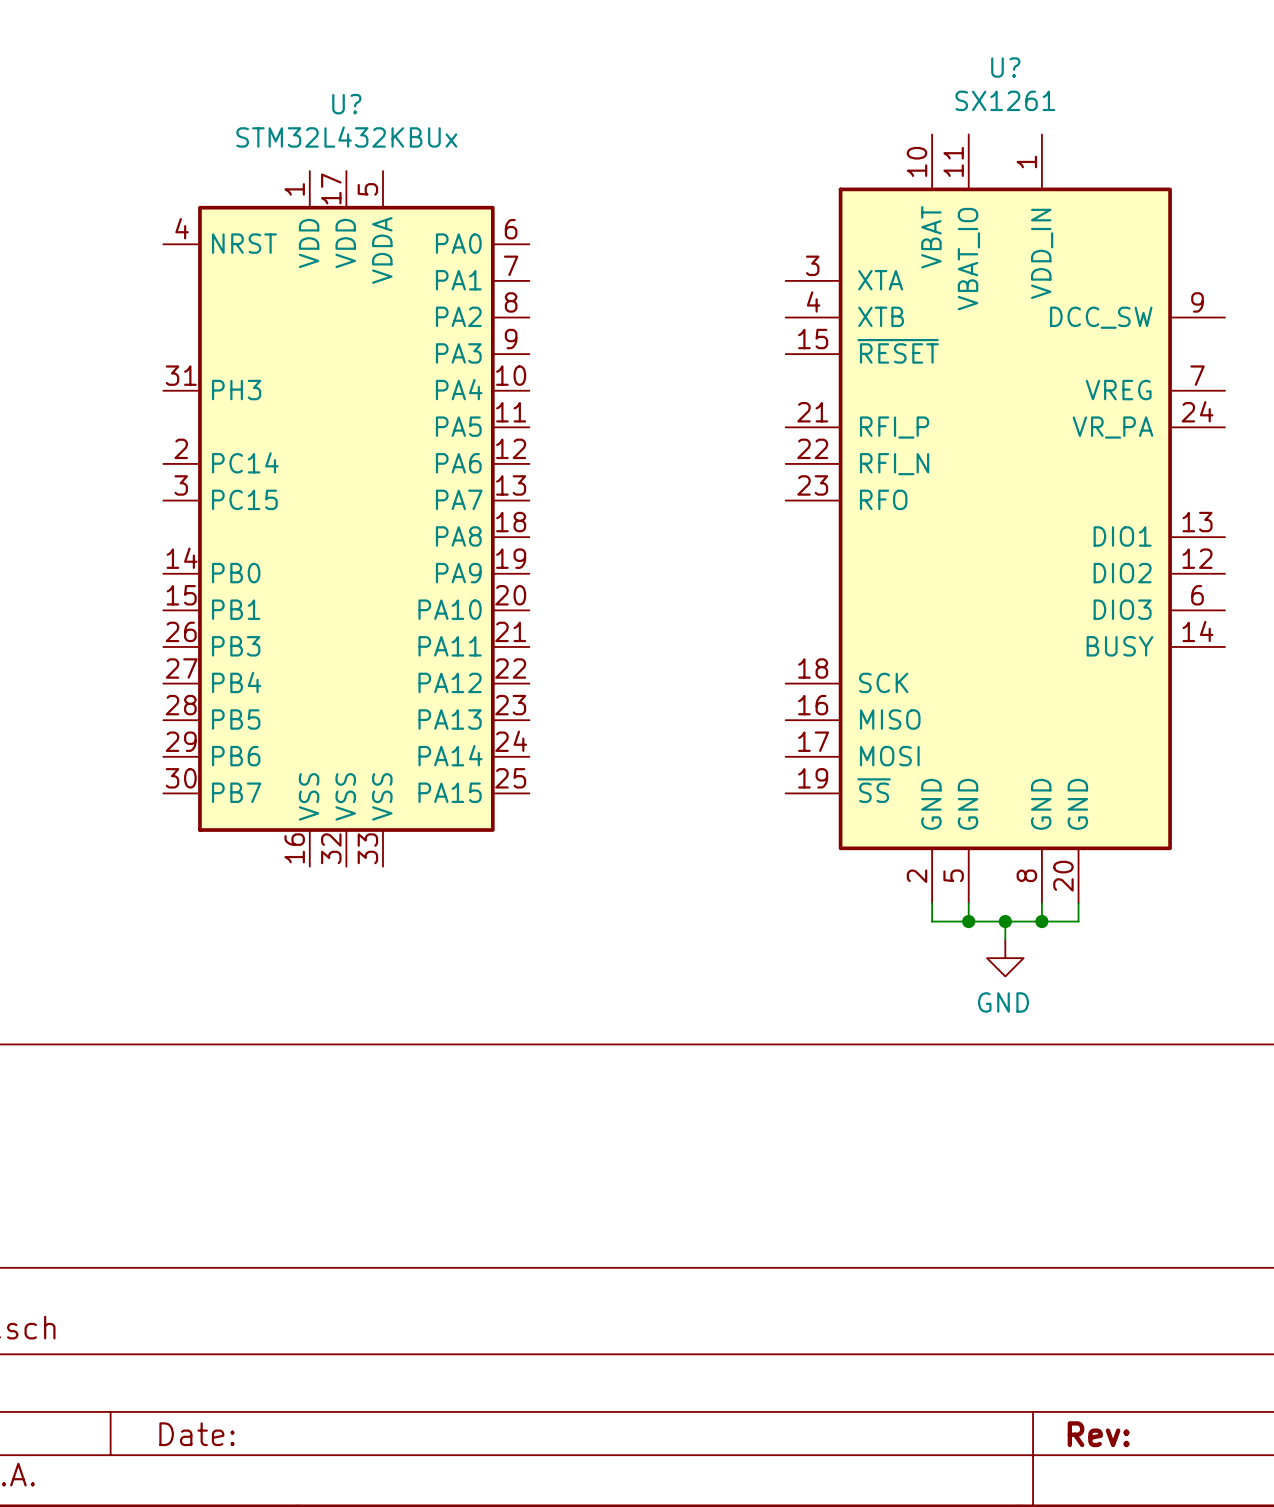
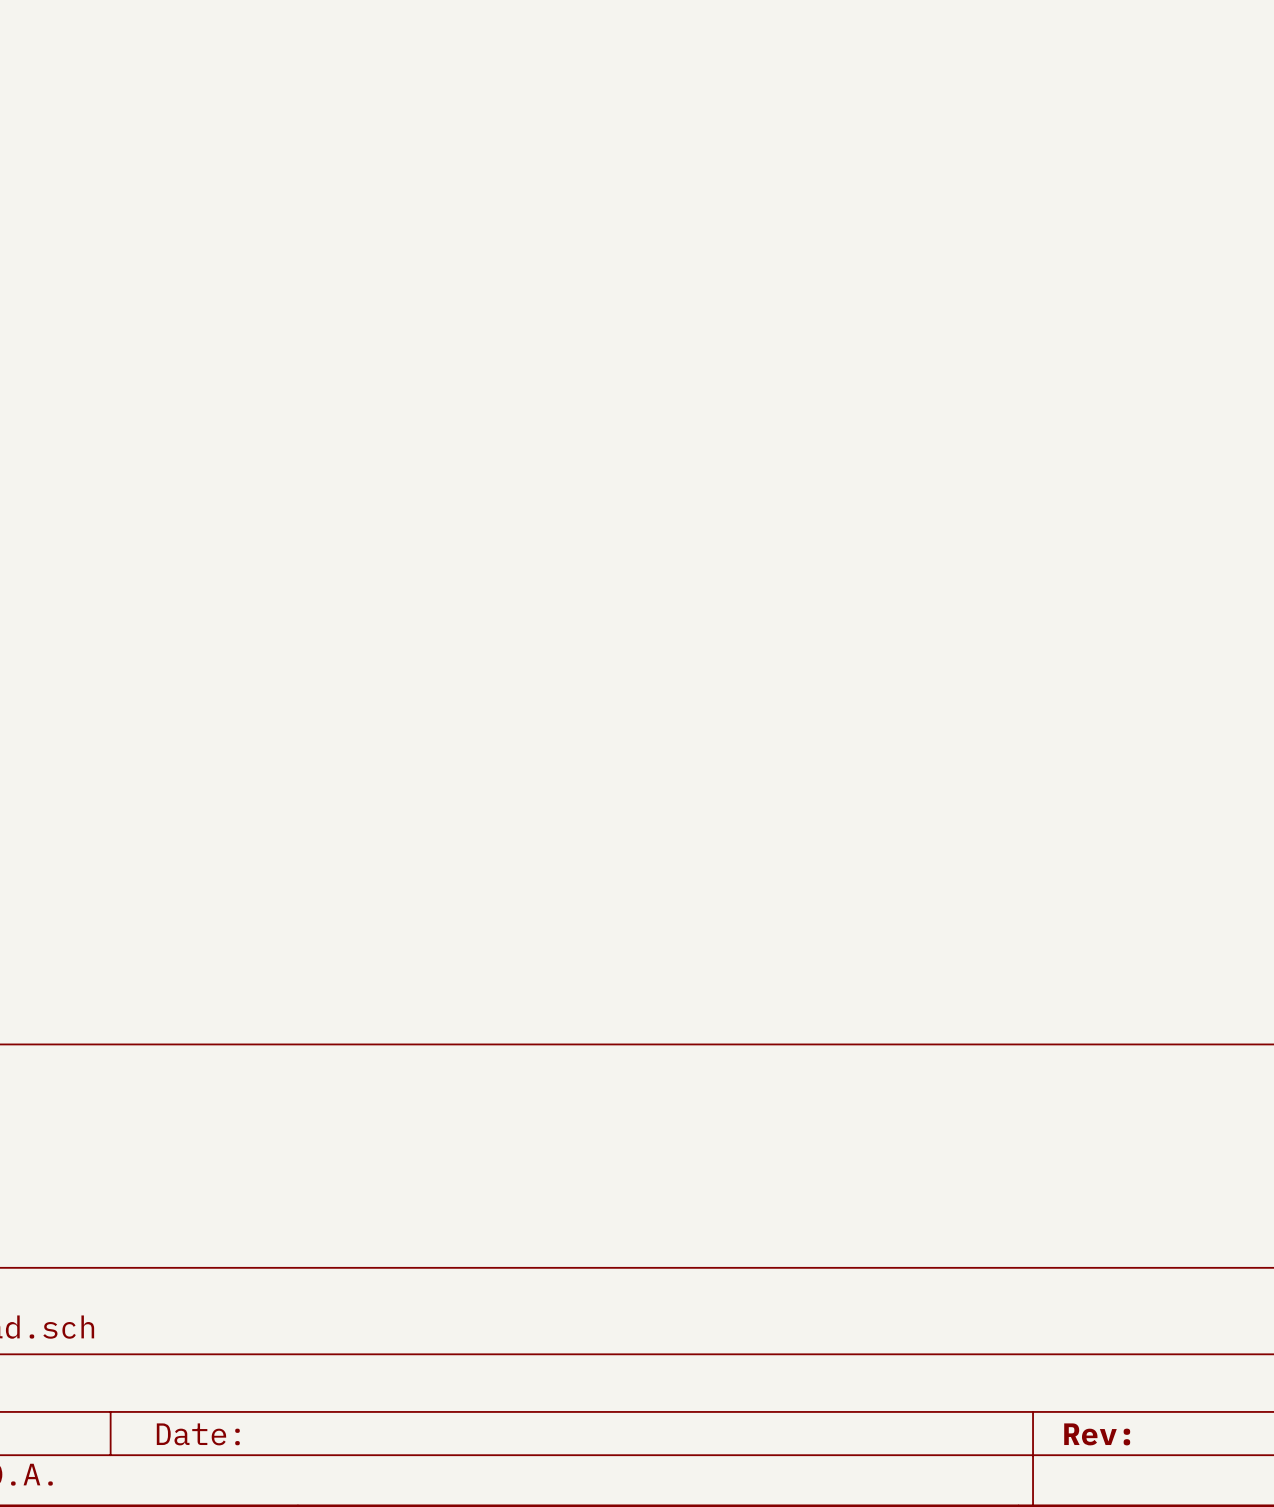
U?: STM32L432KBUx (346, 518) -> none
U?: SX1261 (1005, 518) -> none
wire: (932, 903) (932, 921) (1078, 921) (1078, 903) -> none
wire: (968, 903) (968, 921) -> none
wire: (1041, 903) (1041, 921) -> none
junction: (968, 921) -> none
wire: (1005, 921) (1005, 939) -> none
junction: (1005, 921) -> none
junction: (1041, 921) -> none
power symbol: GND (1005, 958) -> none

